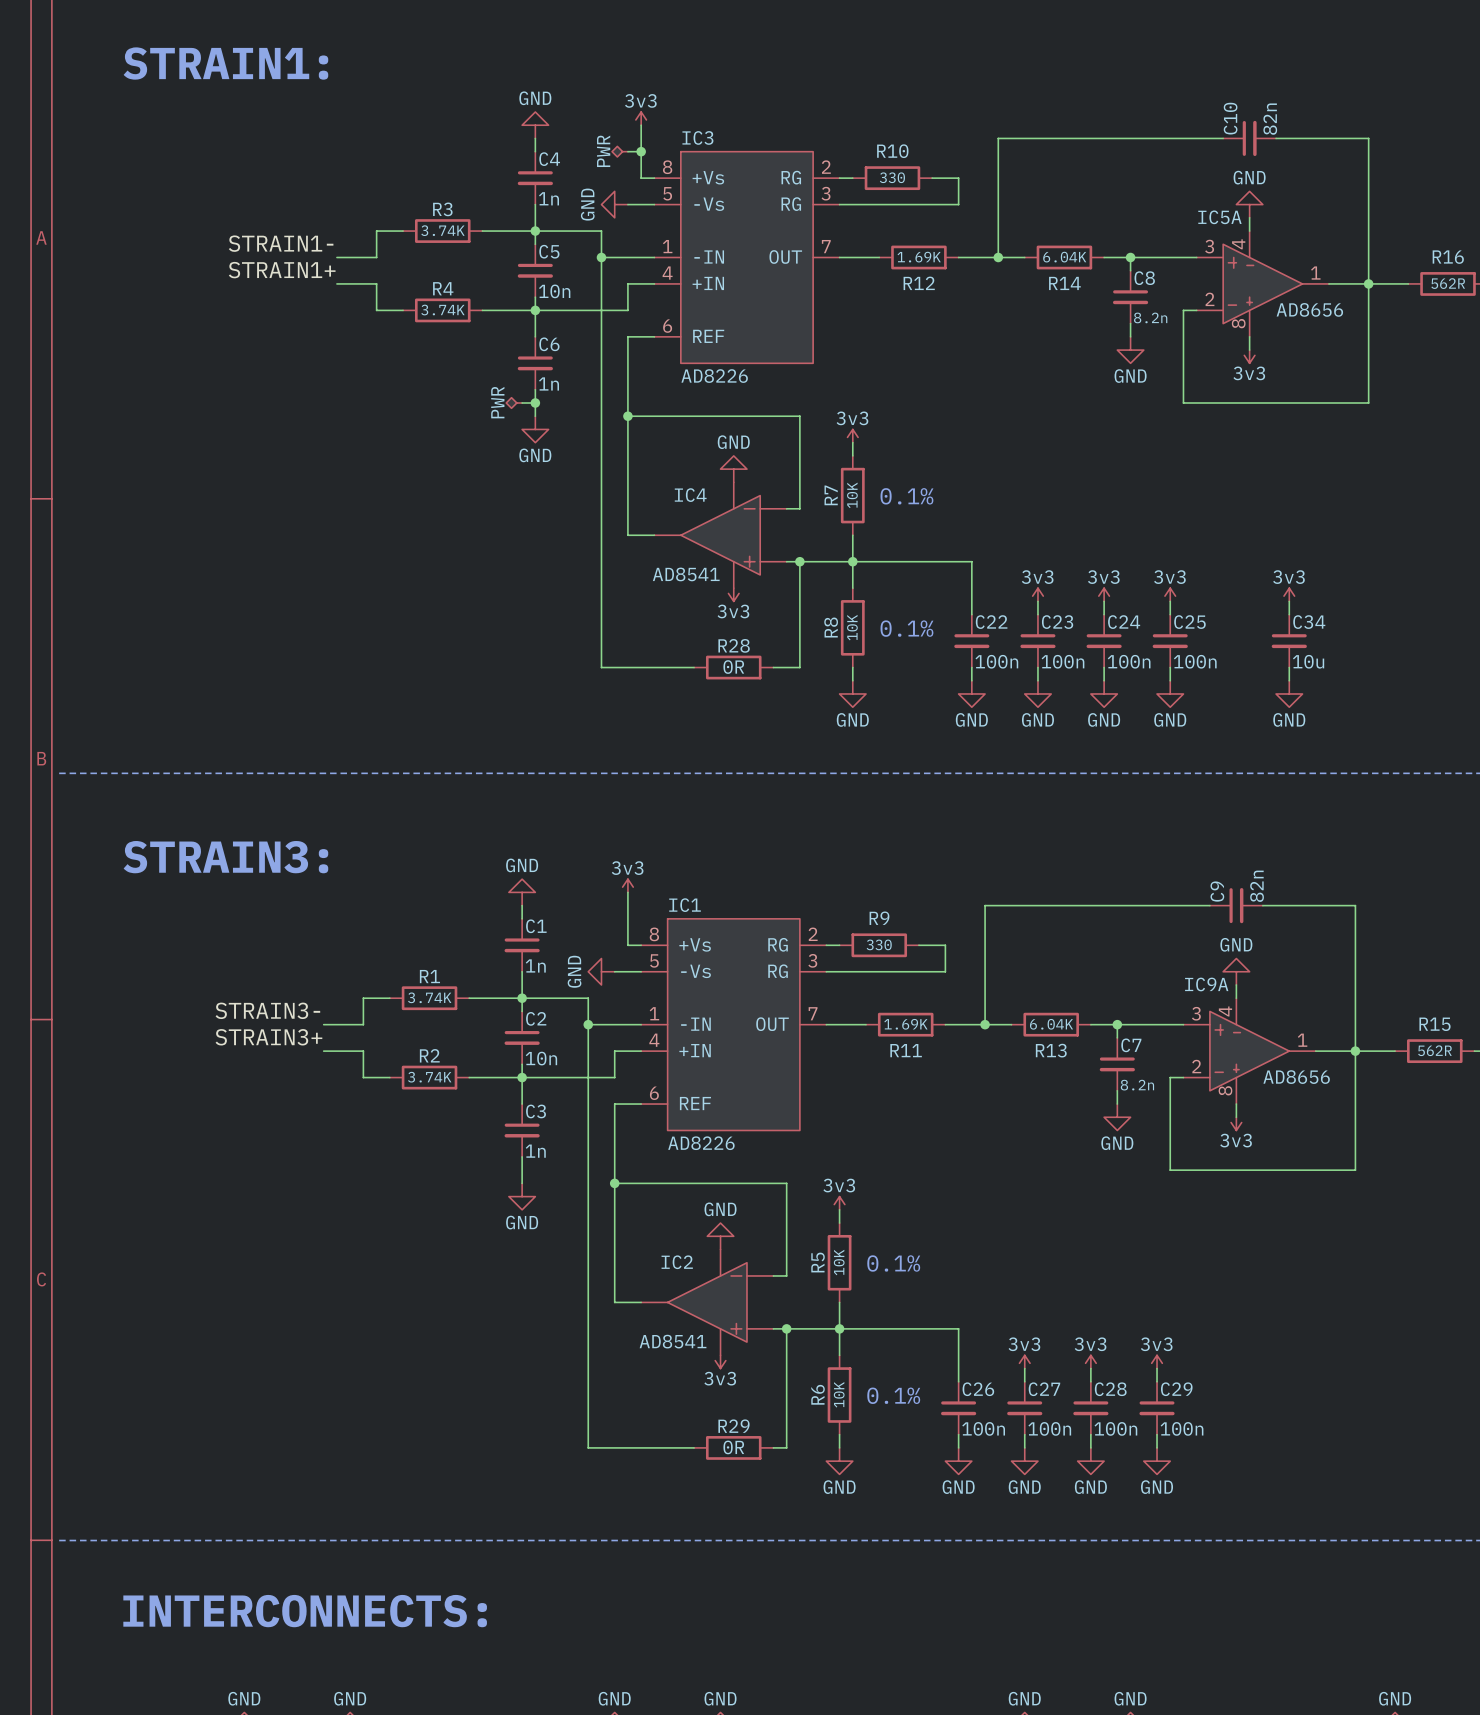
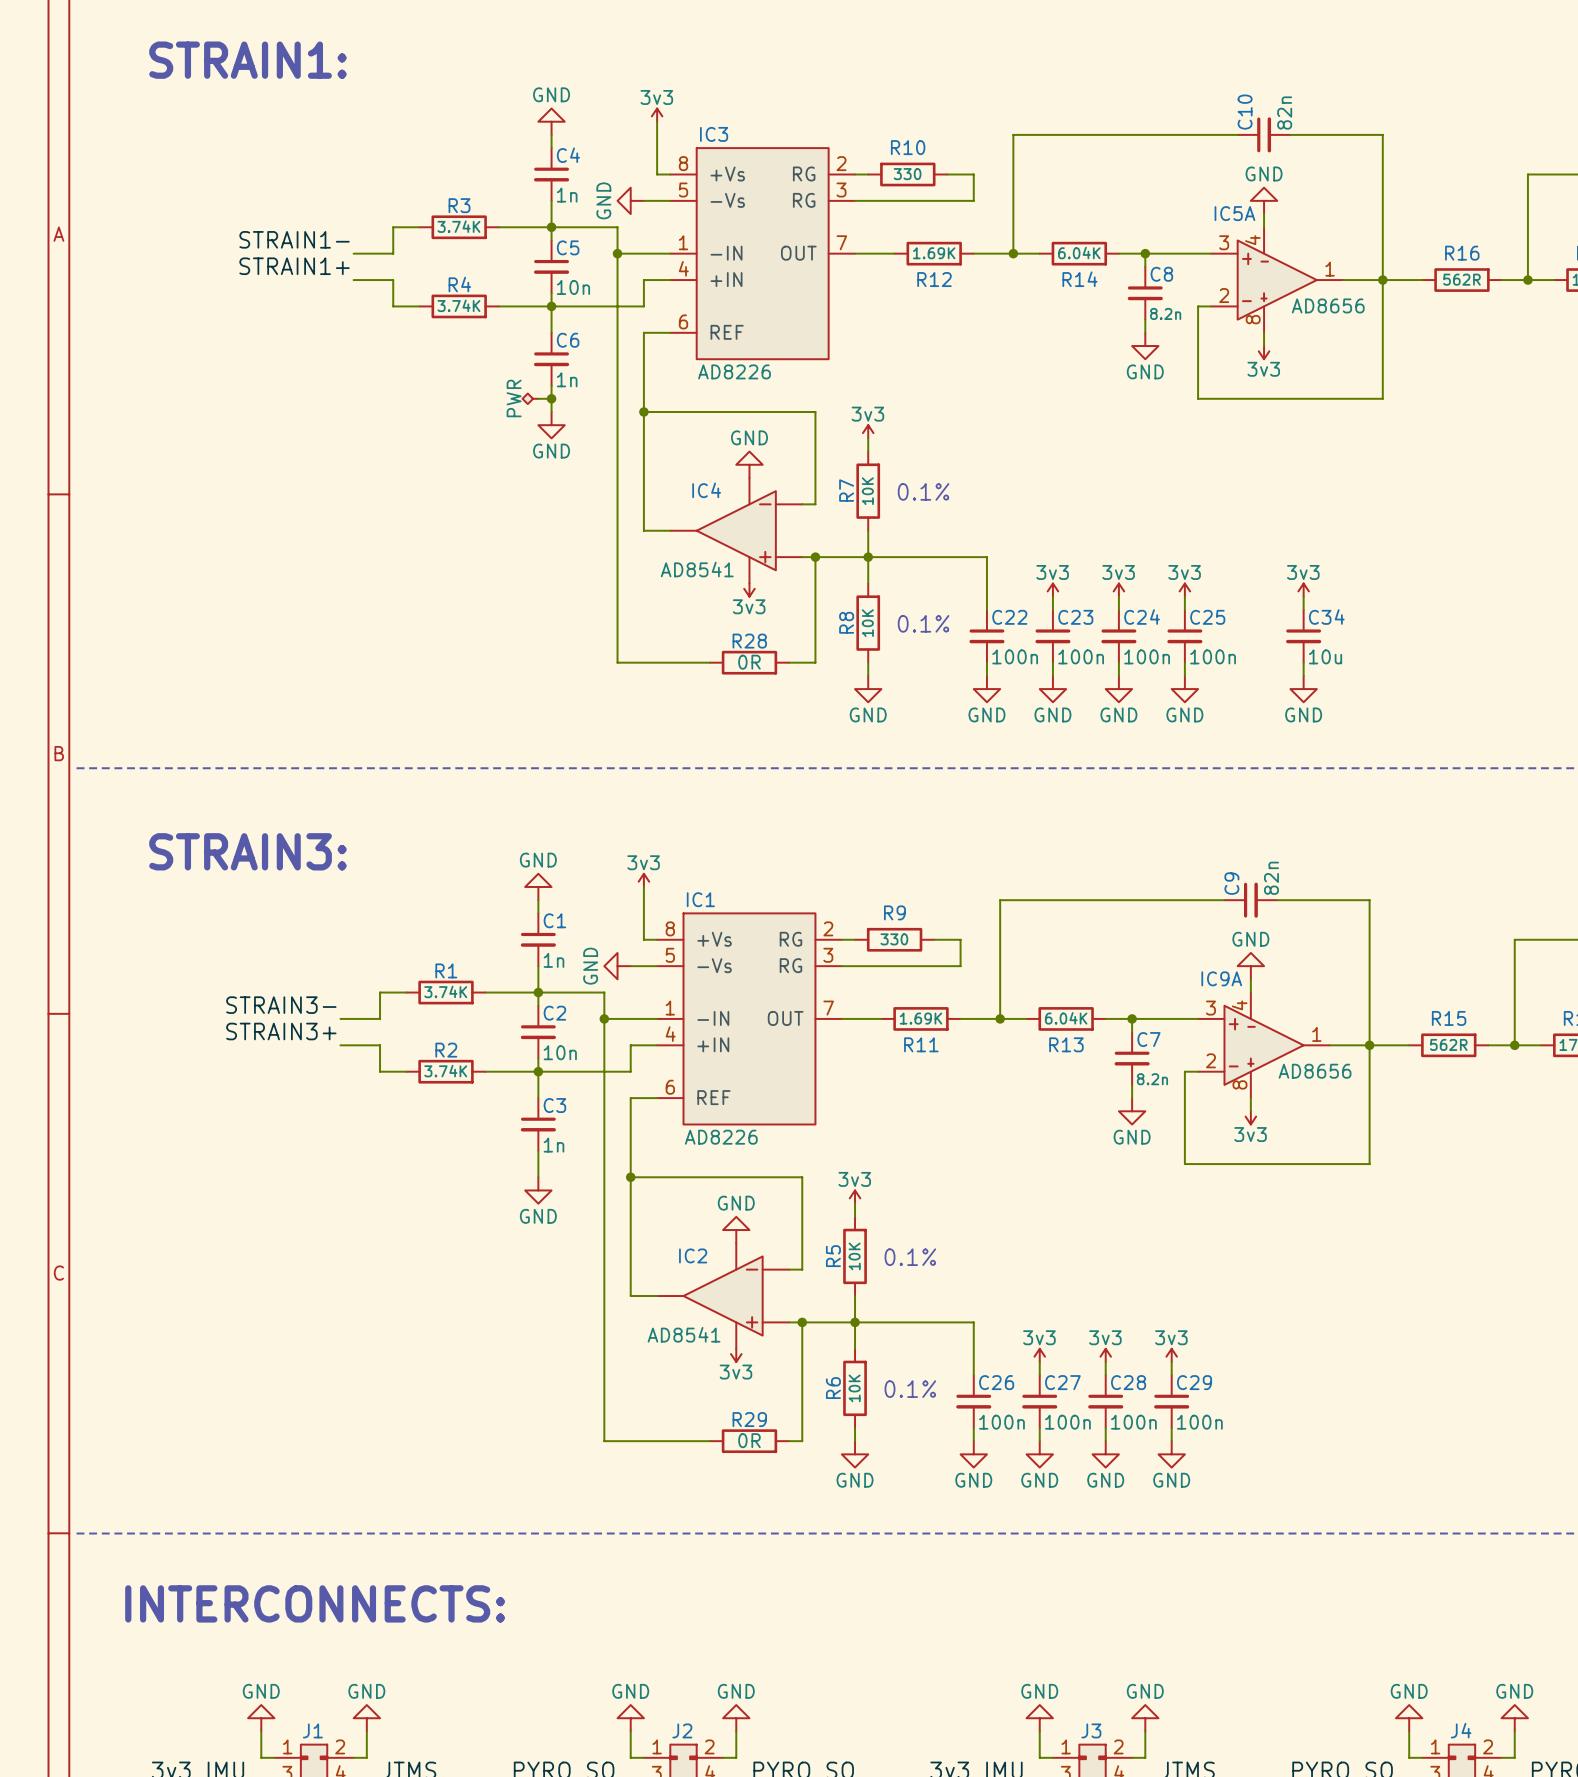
power symbol: PWR (620, 151) -> none
wire: (627, 151) (641, 151) -> none
junction: (641, 151) -> none

